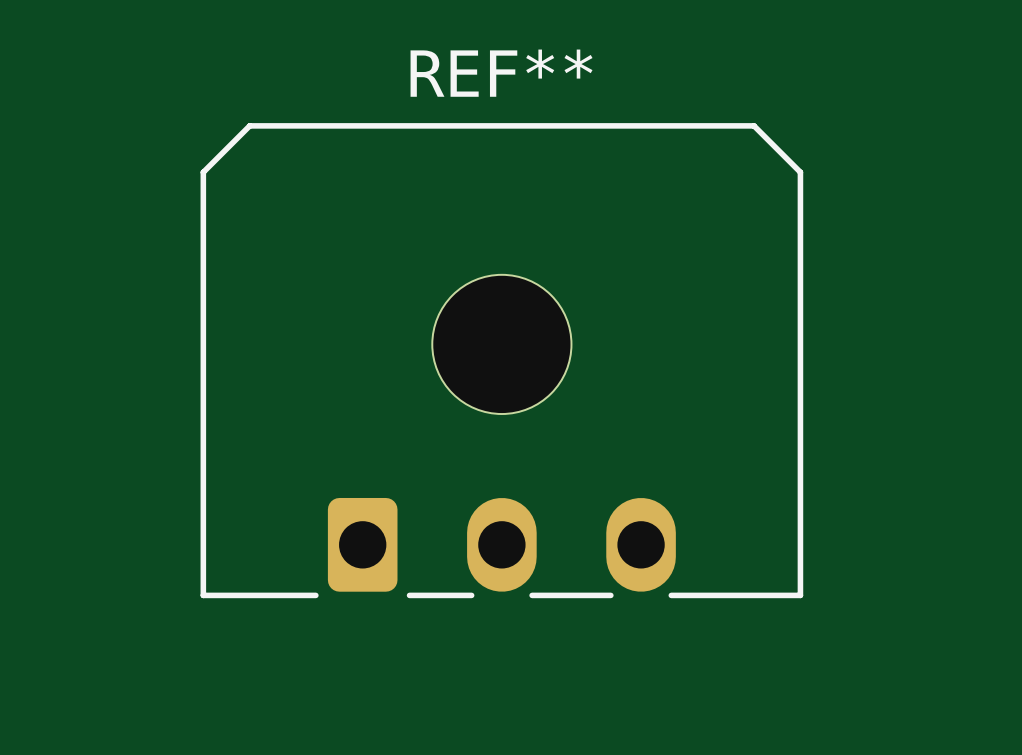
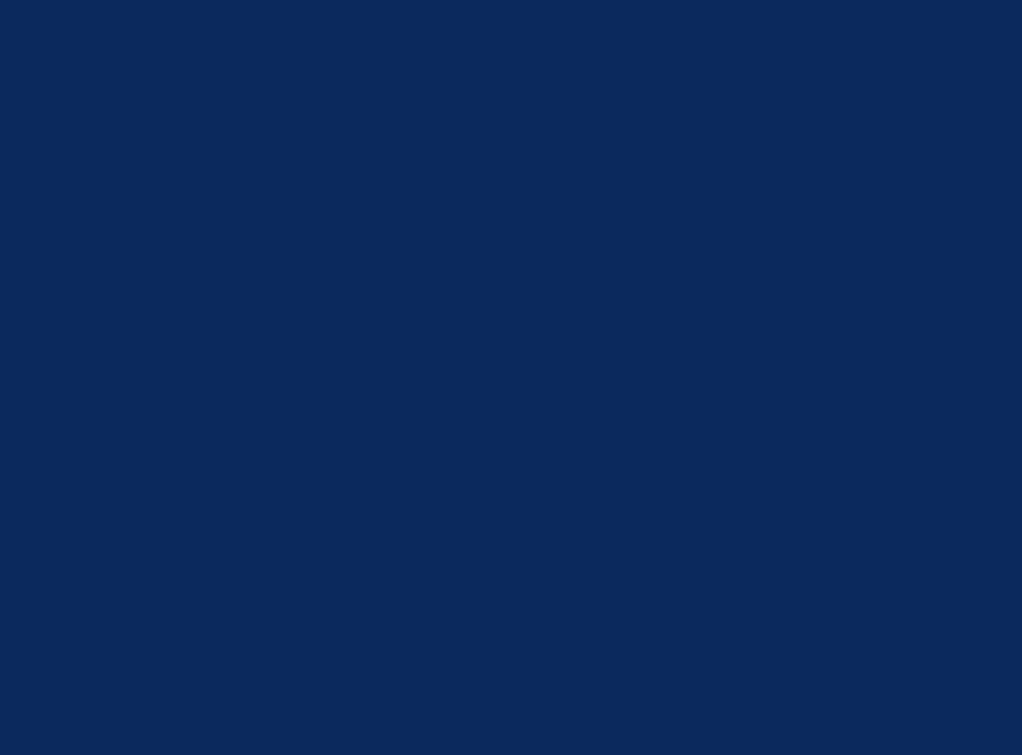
REF**: (501, 360) -> none

